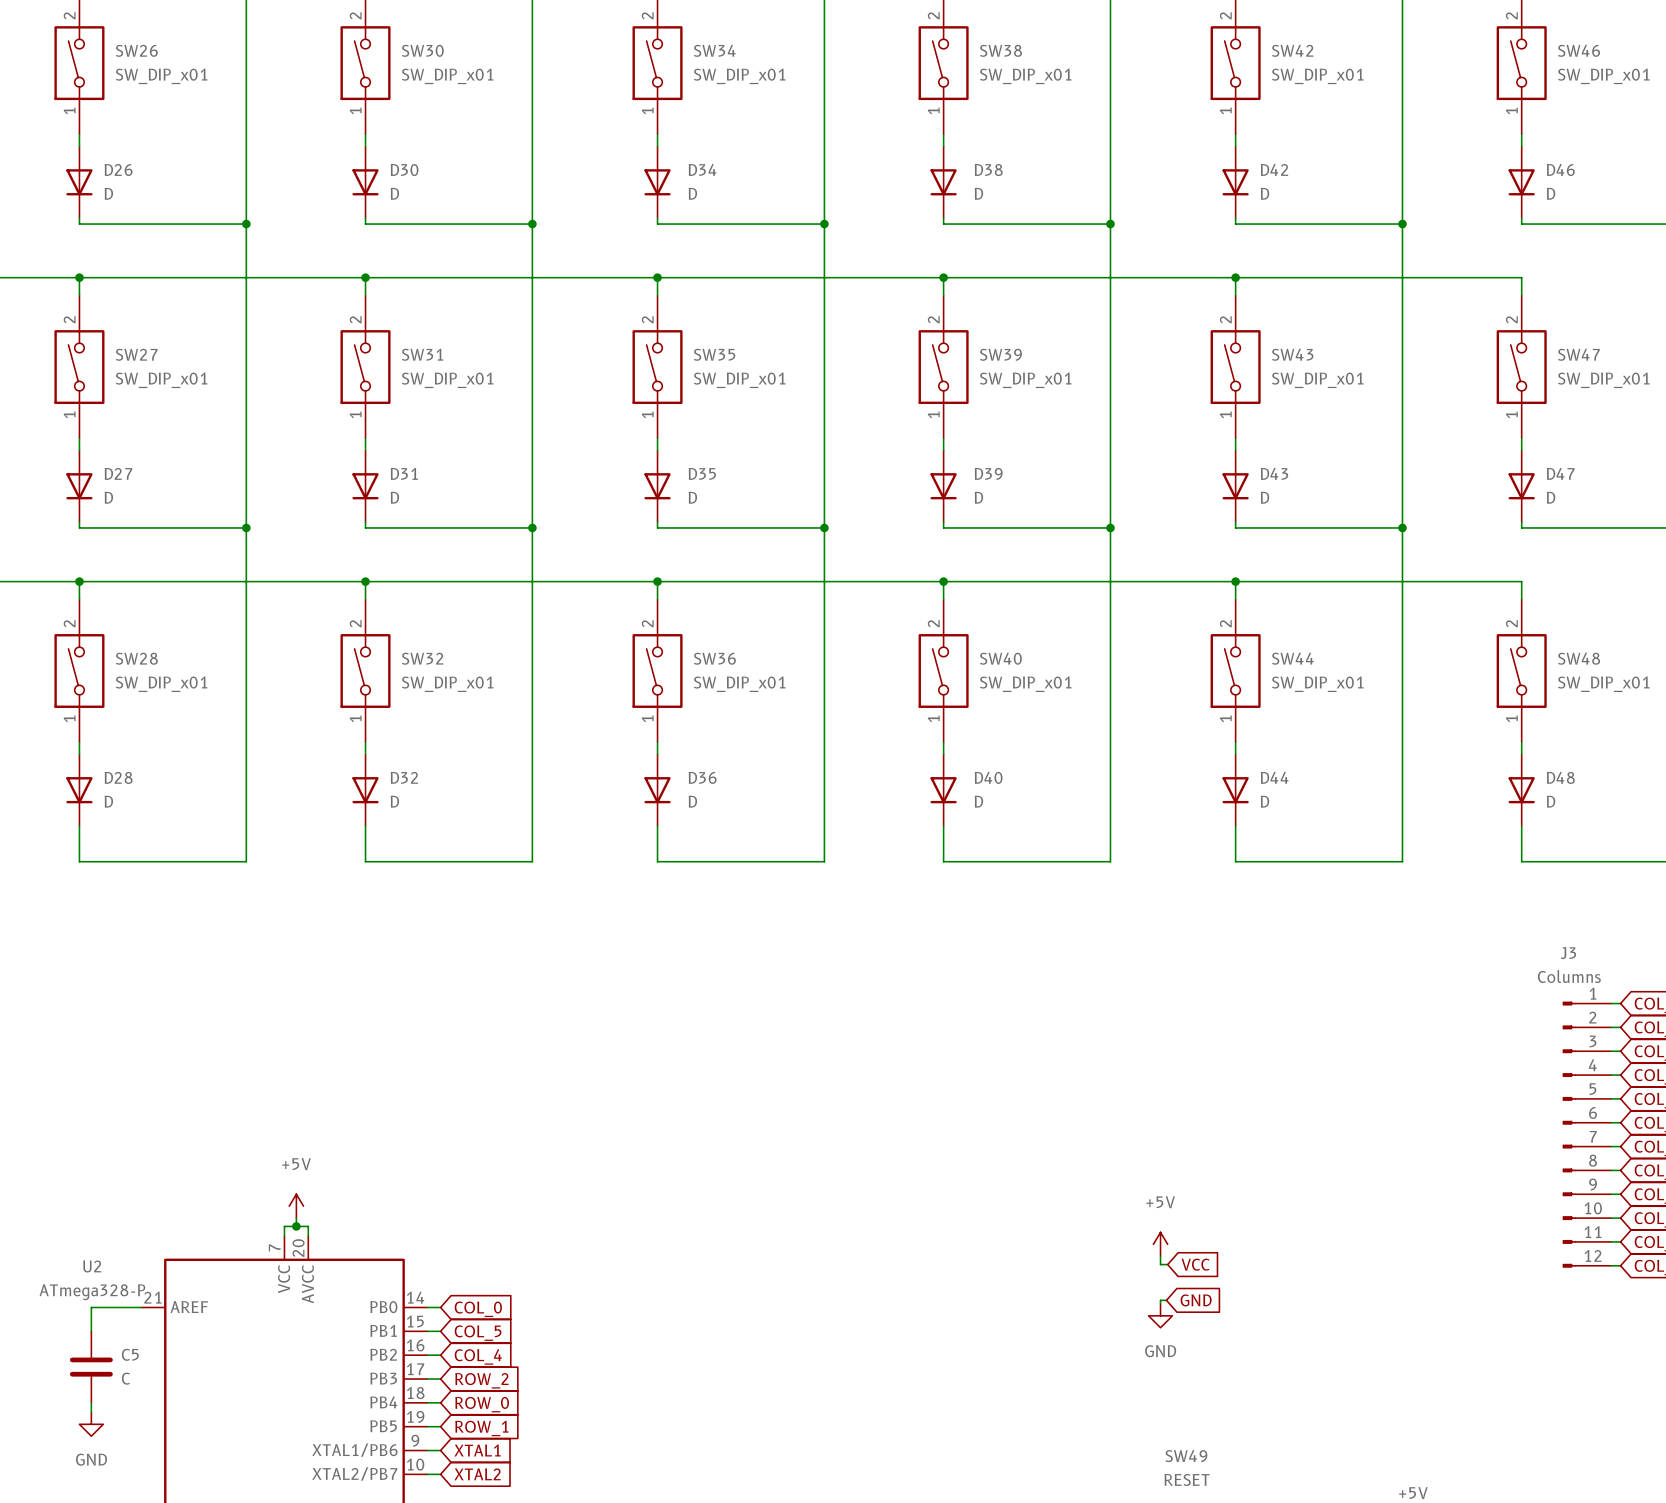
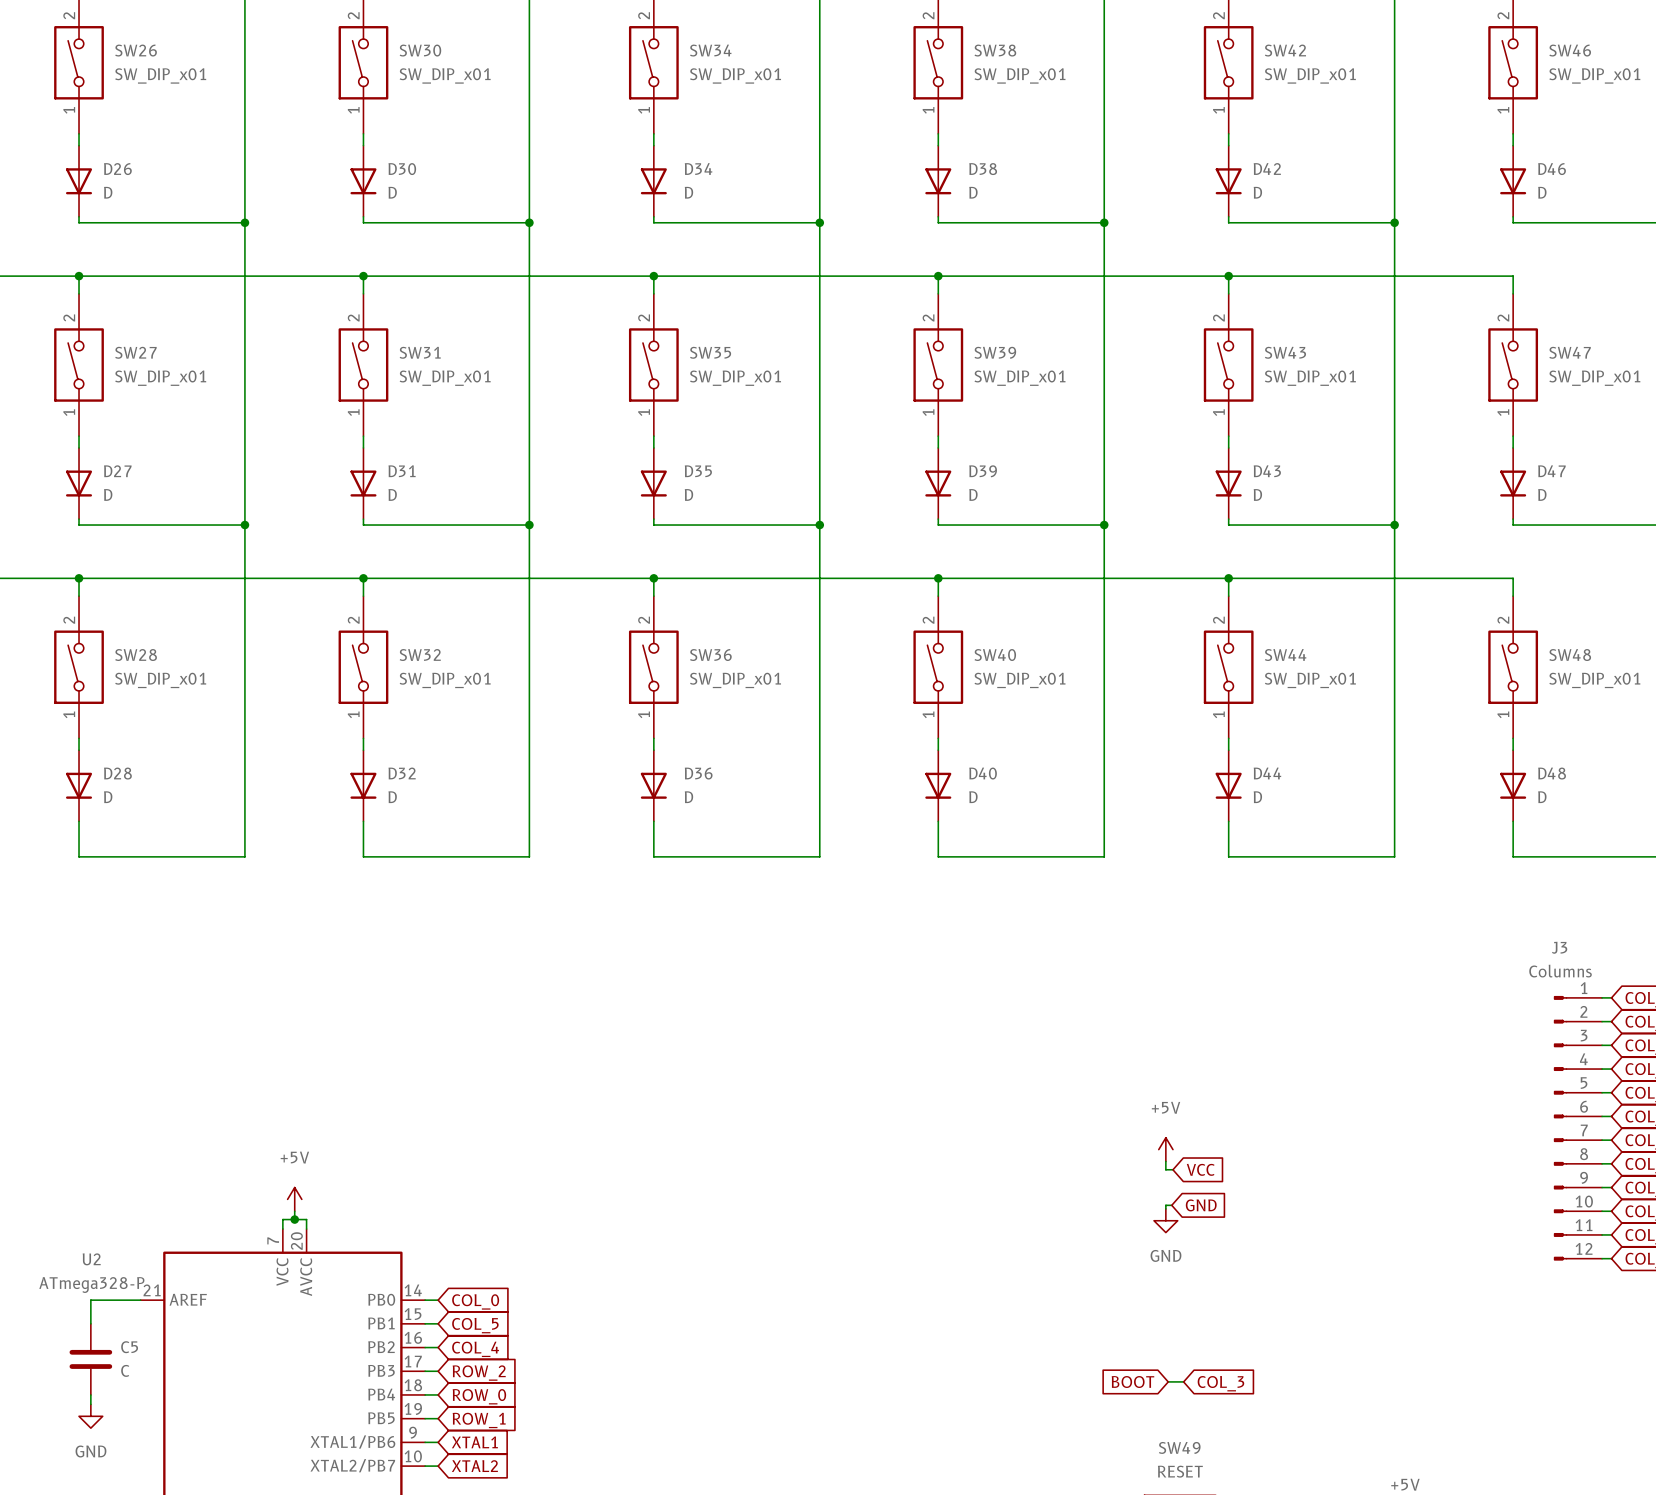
power symbol position: +5V (1160, 1244) -> +5V (1165, 1149)
wire: (1160, 1256) (1160, 1264) (1167, 1264) -> (1165, 1161) (1165, 1169) (1172, 1169)
global label position: VCC (1195, 1264) -> VCC (1200, 1169)
wire: (1166, 1300) (1160, 1300) (1160, 1303) -> (1171, 1205) (1165, 1205) (1165, 1208)
global label position: GND (1196, 1300) -> GND (1201, 1205)
power symbol position: GND (1160, 1315) -> GND (1165, 1220)
global label: none -> BOOT (1132, 1382)
wire: none -> (1168, 1381) (1183, 1381)
global label: none -> COL_3 (1220, 1383)

